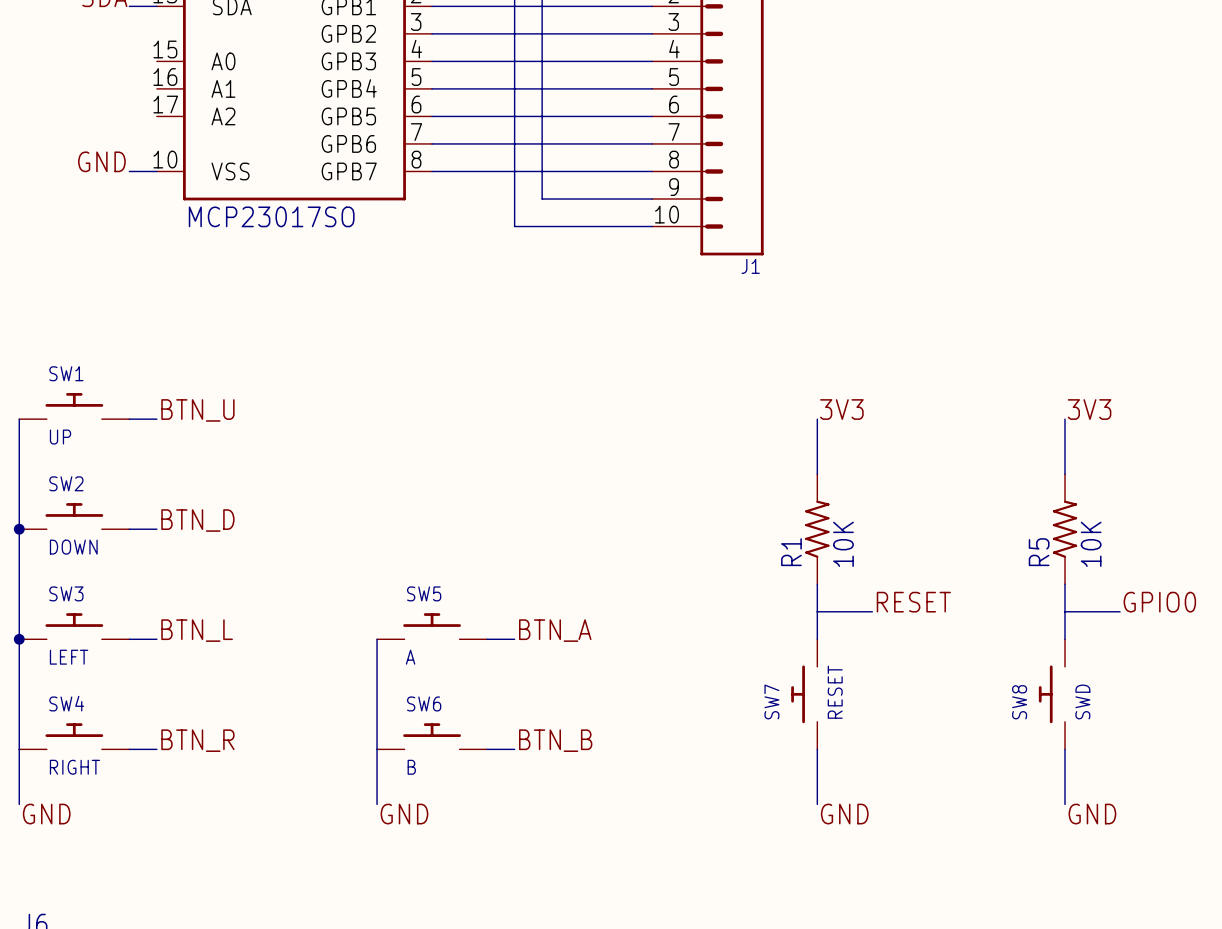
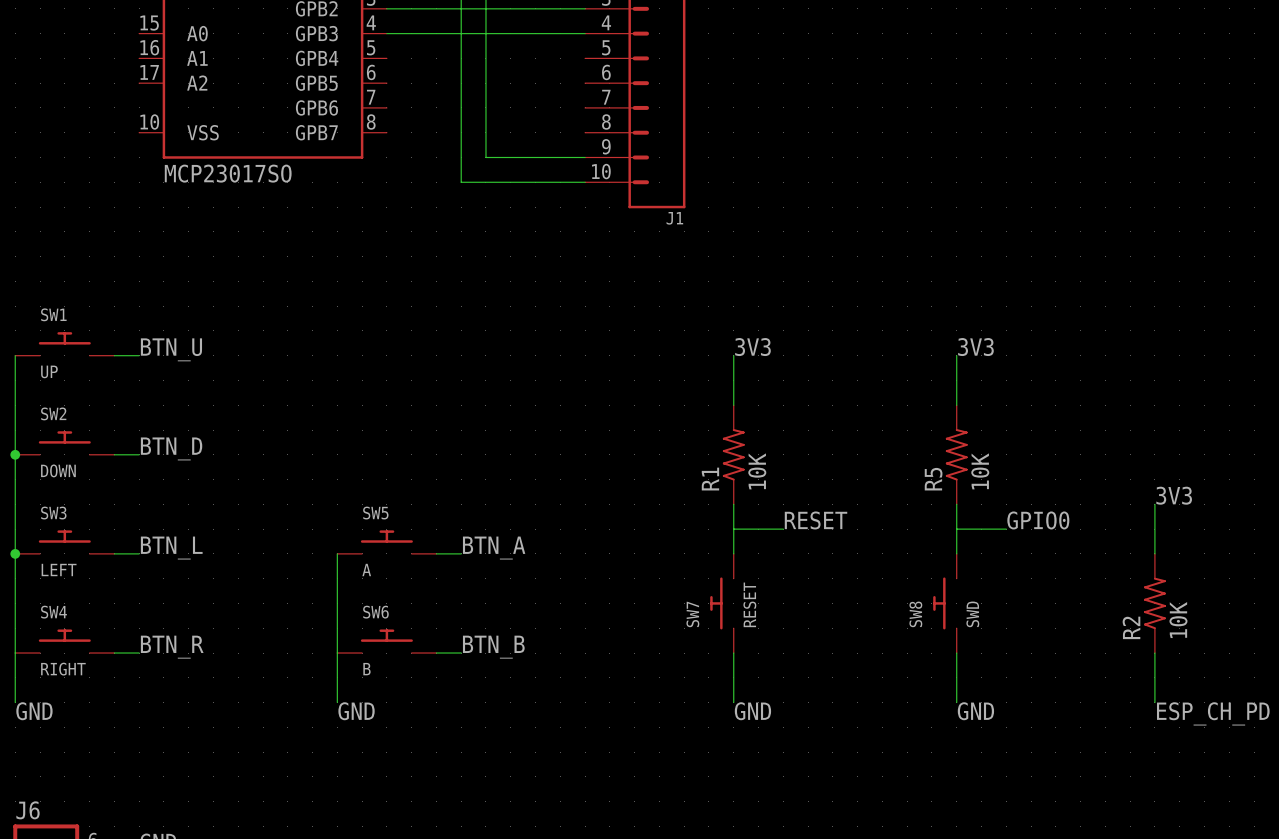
wire: (432, 88) (652, 88) -> none
wire: (432, 116) (652, 116) -> none
wire: (432, 143) (652, 143) -> none
label: GND (101, 161) -> none
wire: (129, 171) (156, 171) -> none
wire: (432, 171) (652, 171) -> none

